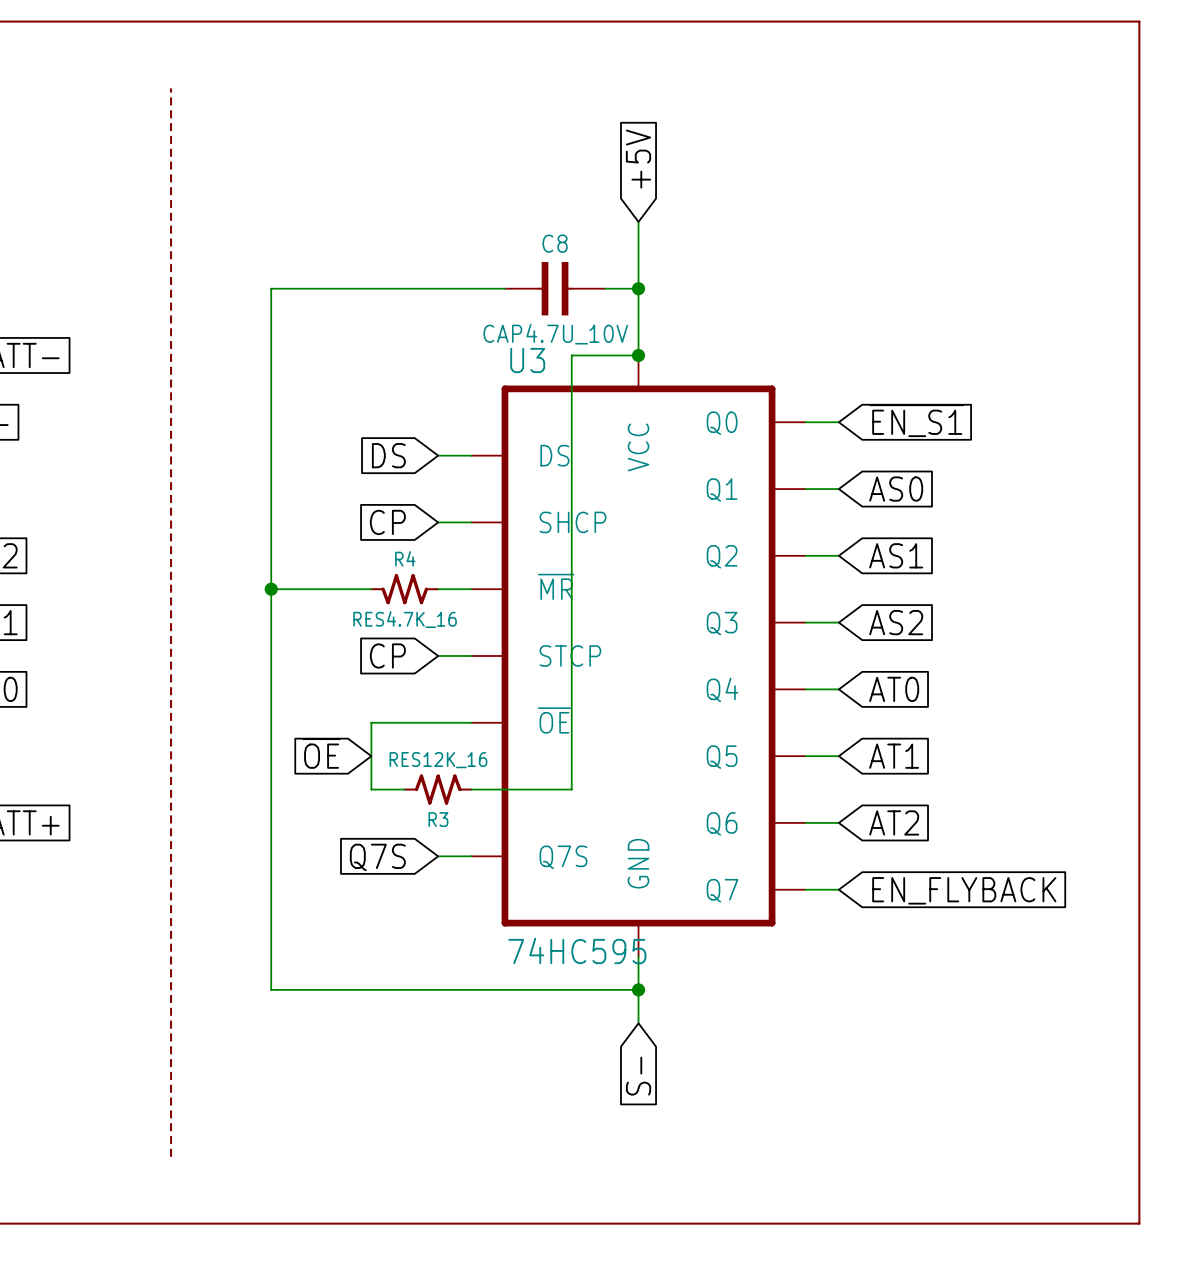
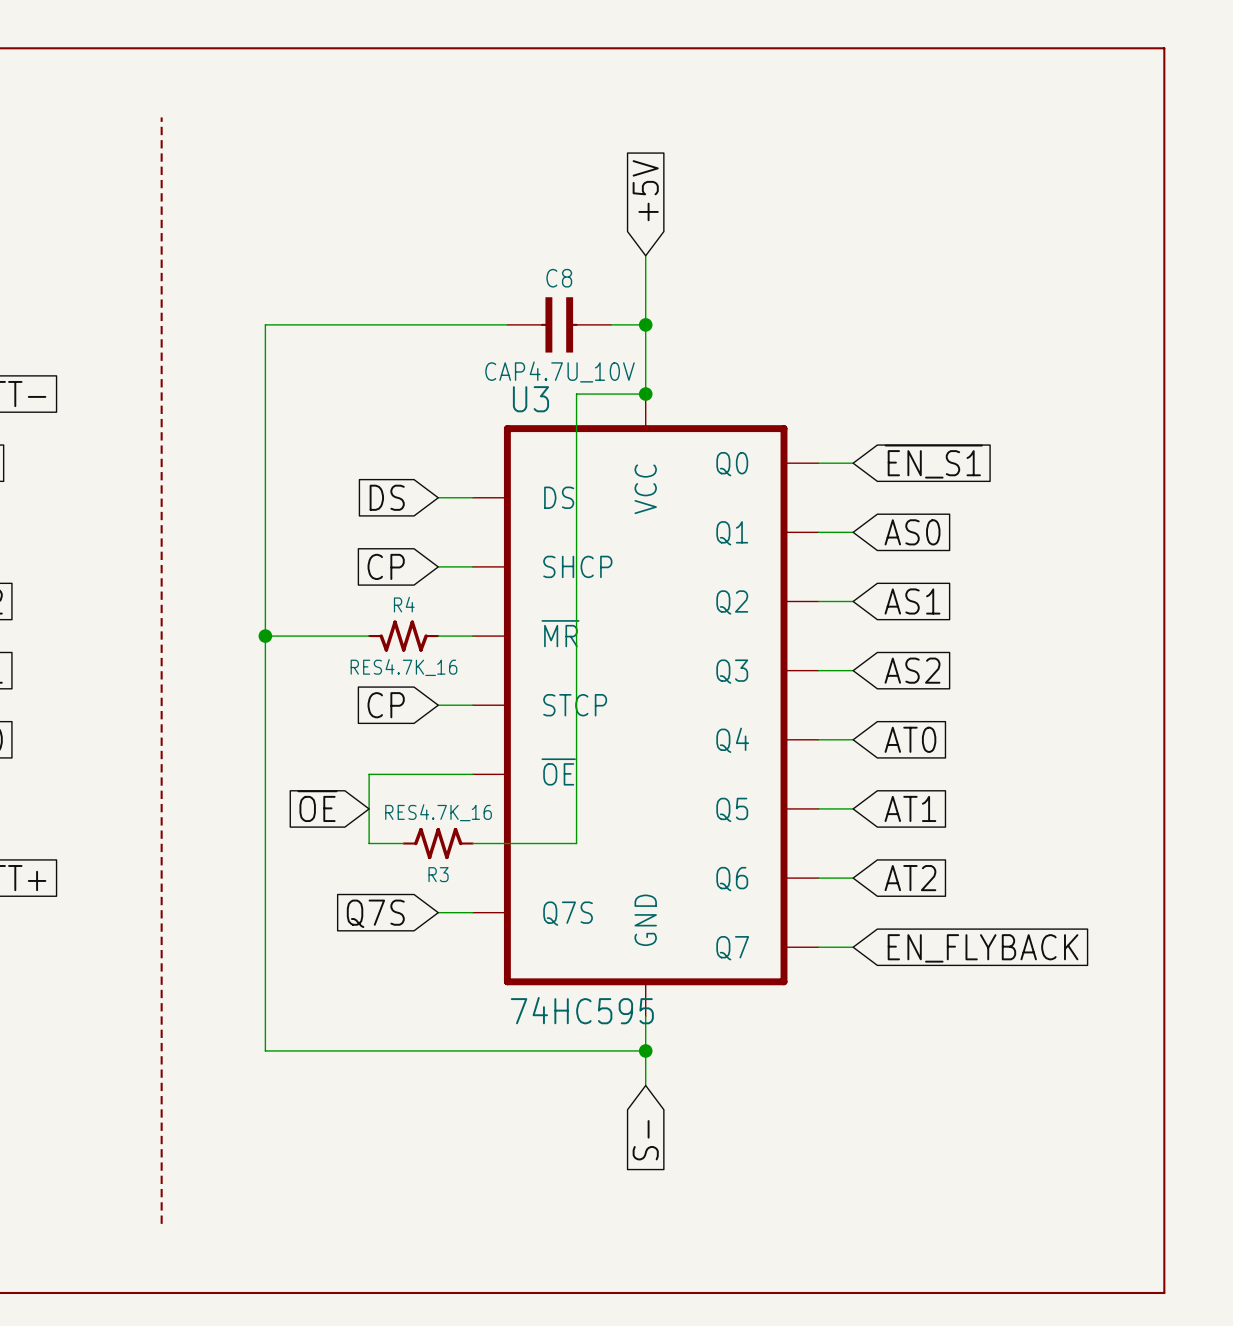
R3 value: RES12K_16 (438, 760) -> RES4.7K_16 (438, 812)

